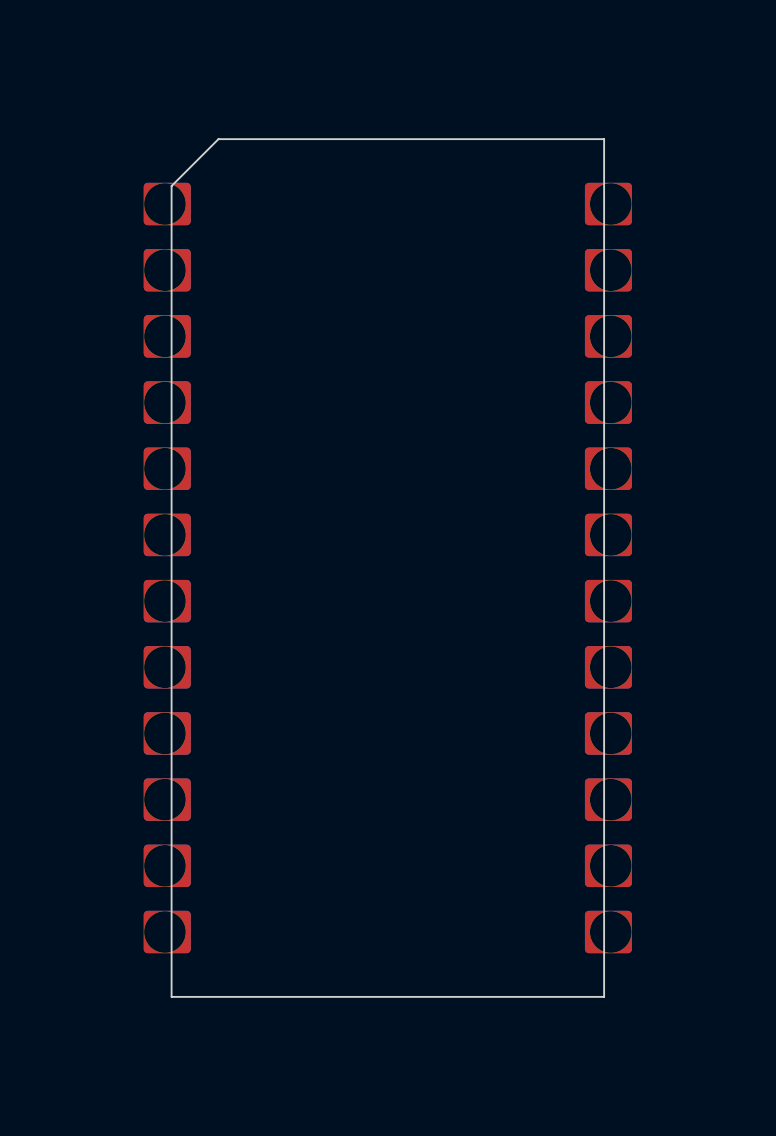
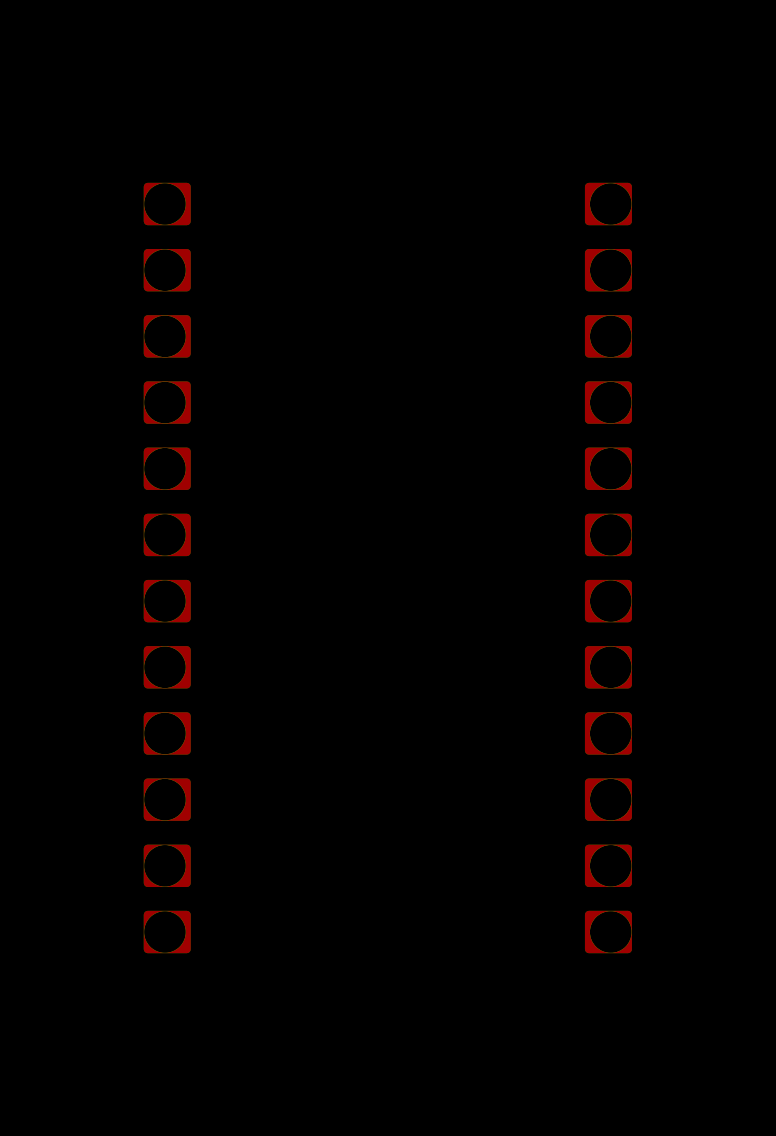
board edge: (218, 139) (171, 186) (171, 996) (604, 996) (604, 139) (218, 139) -> none

